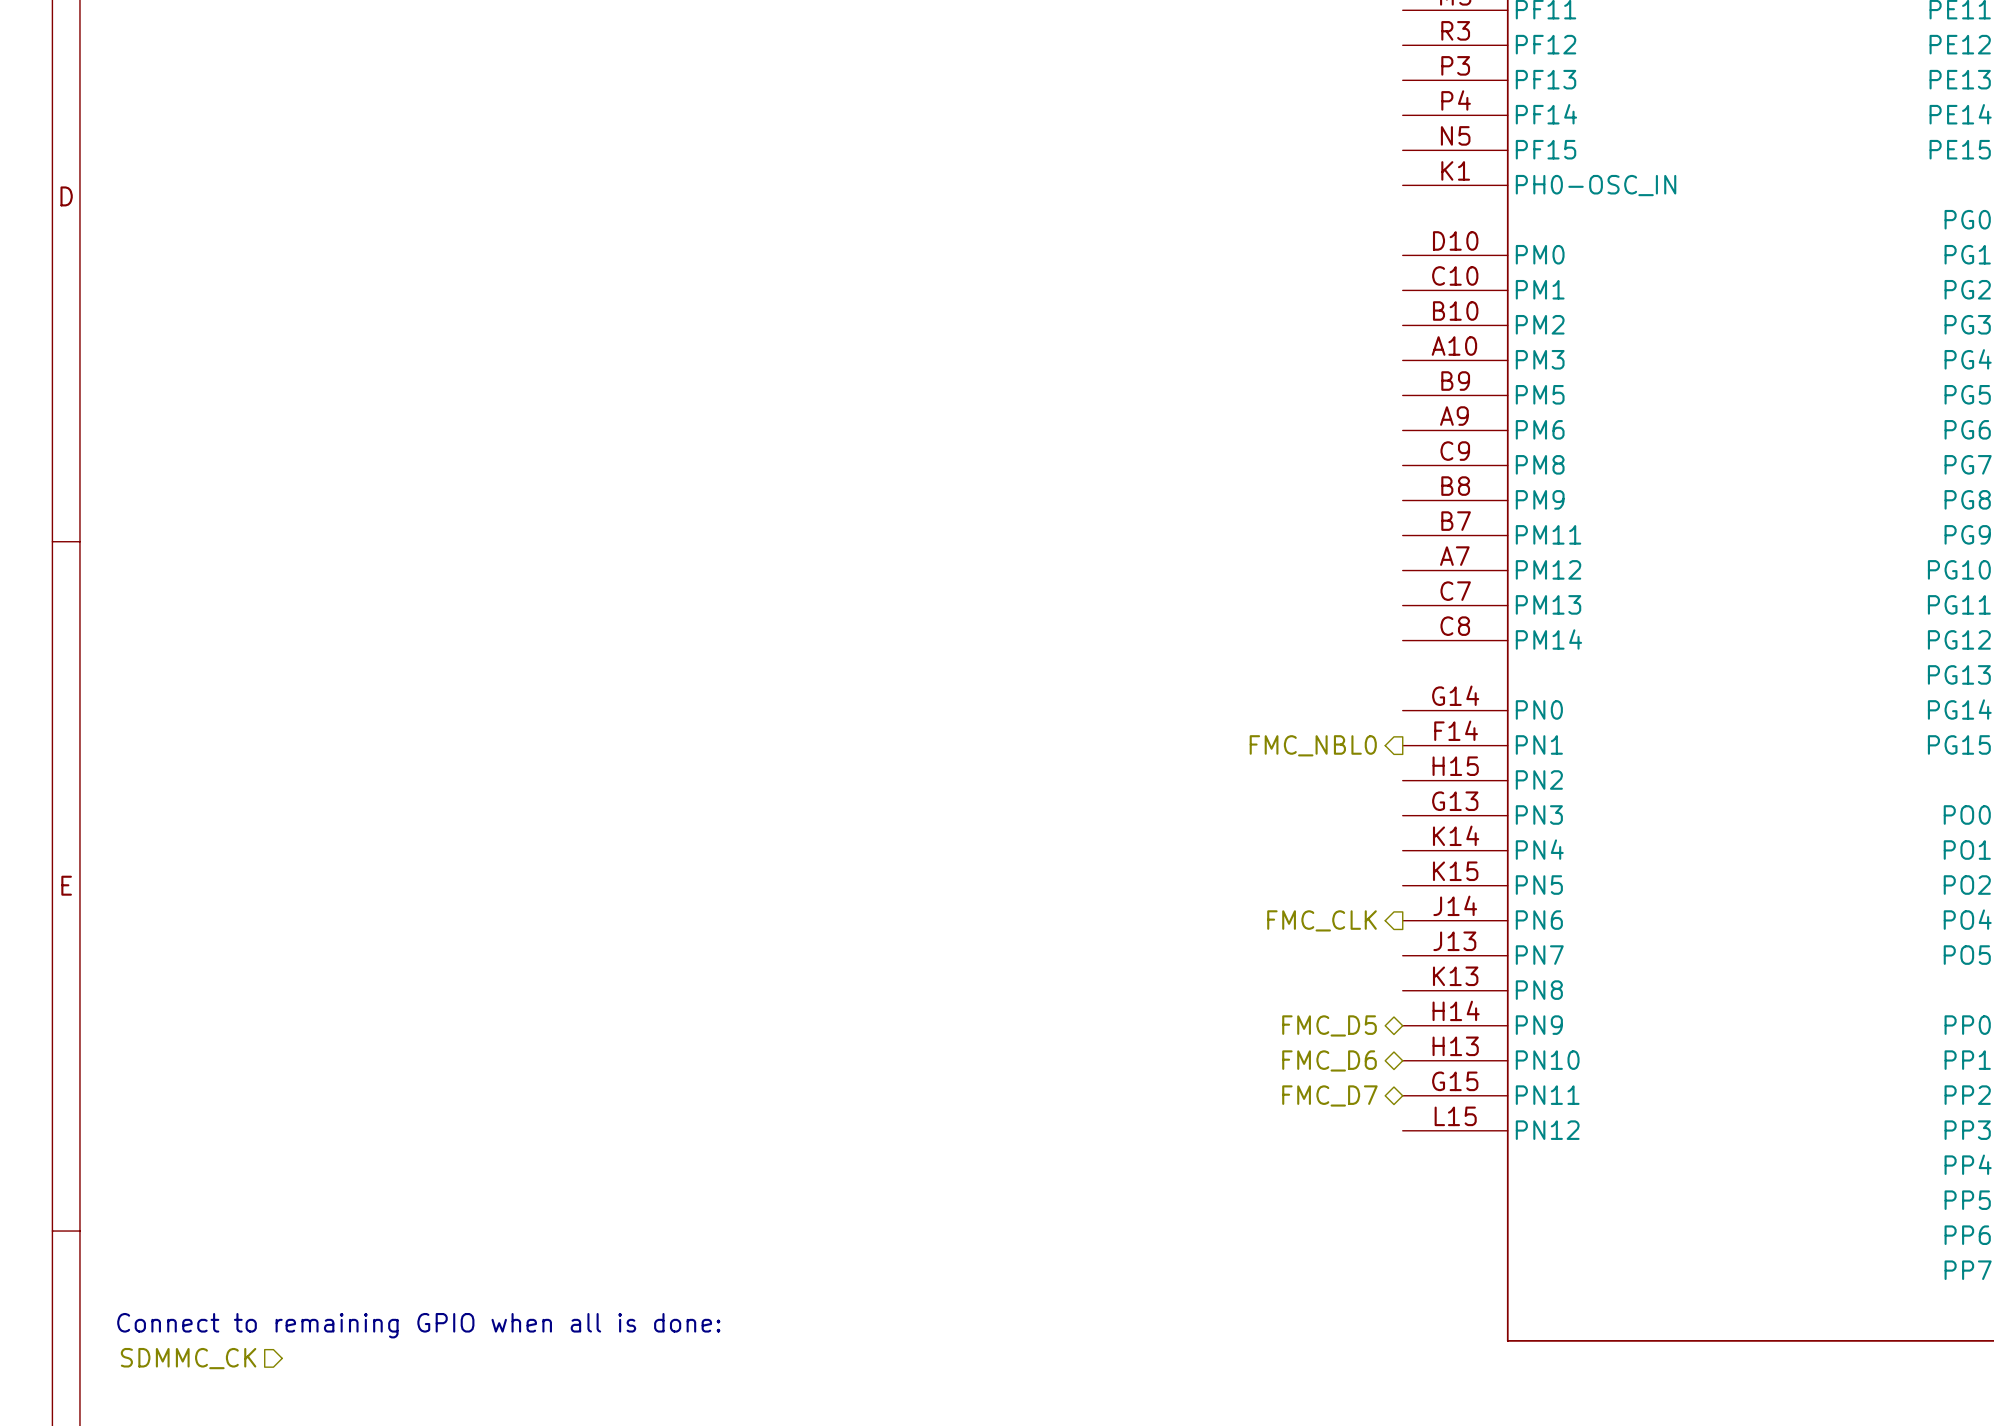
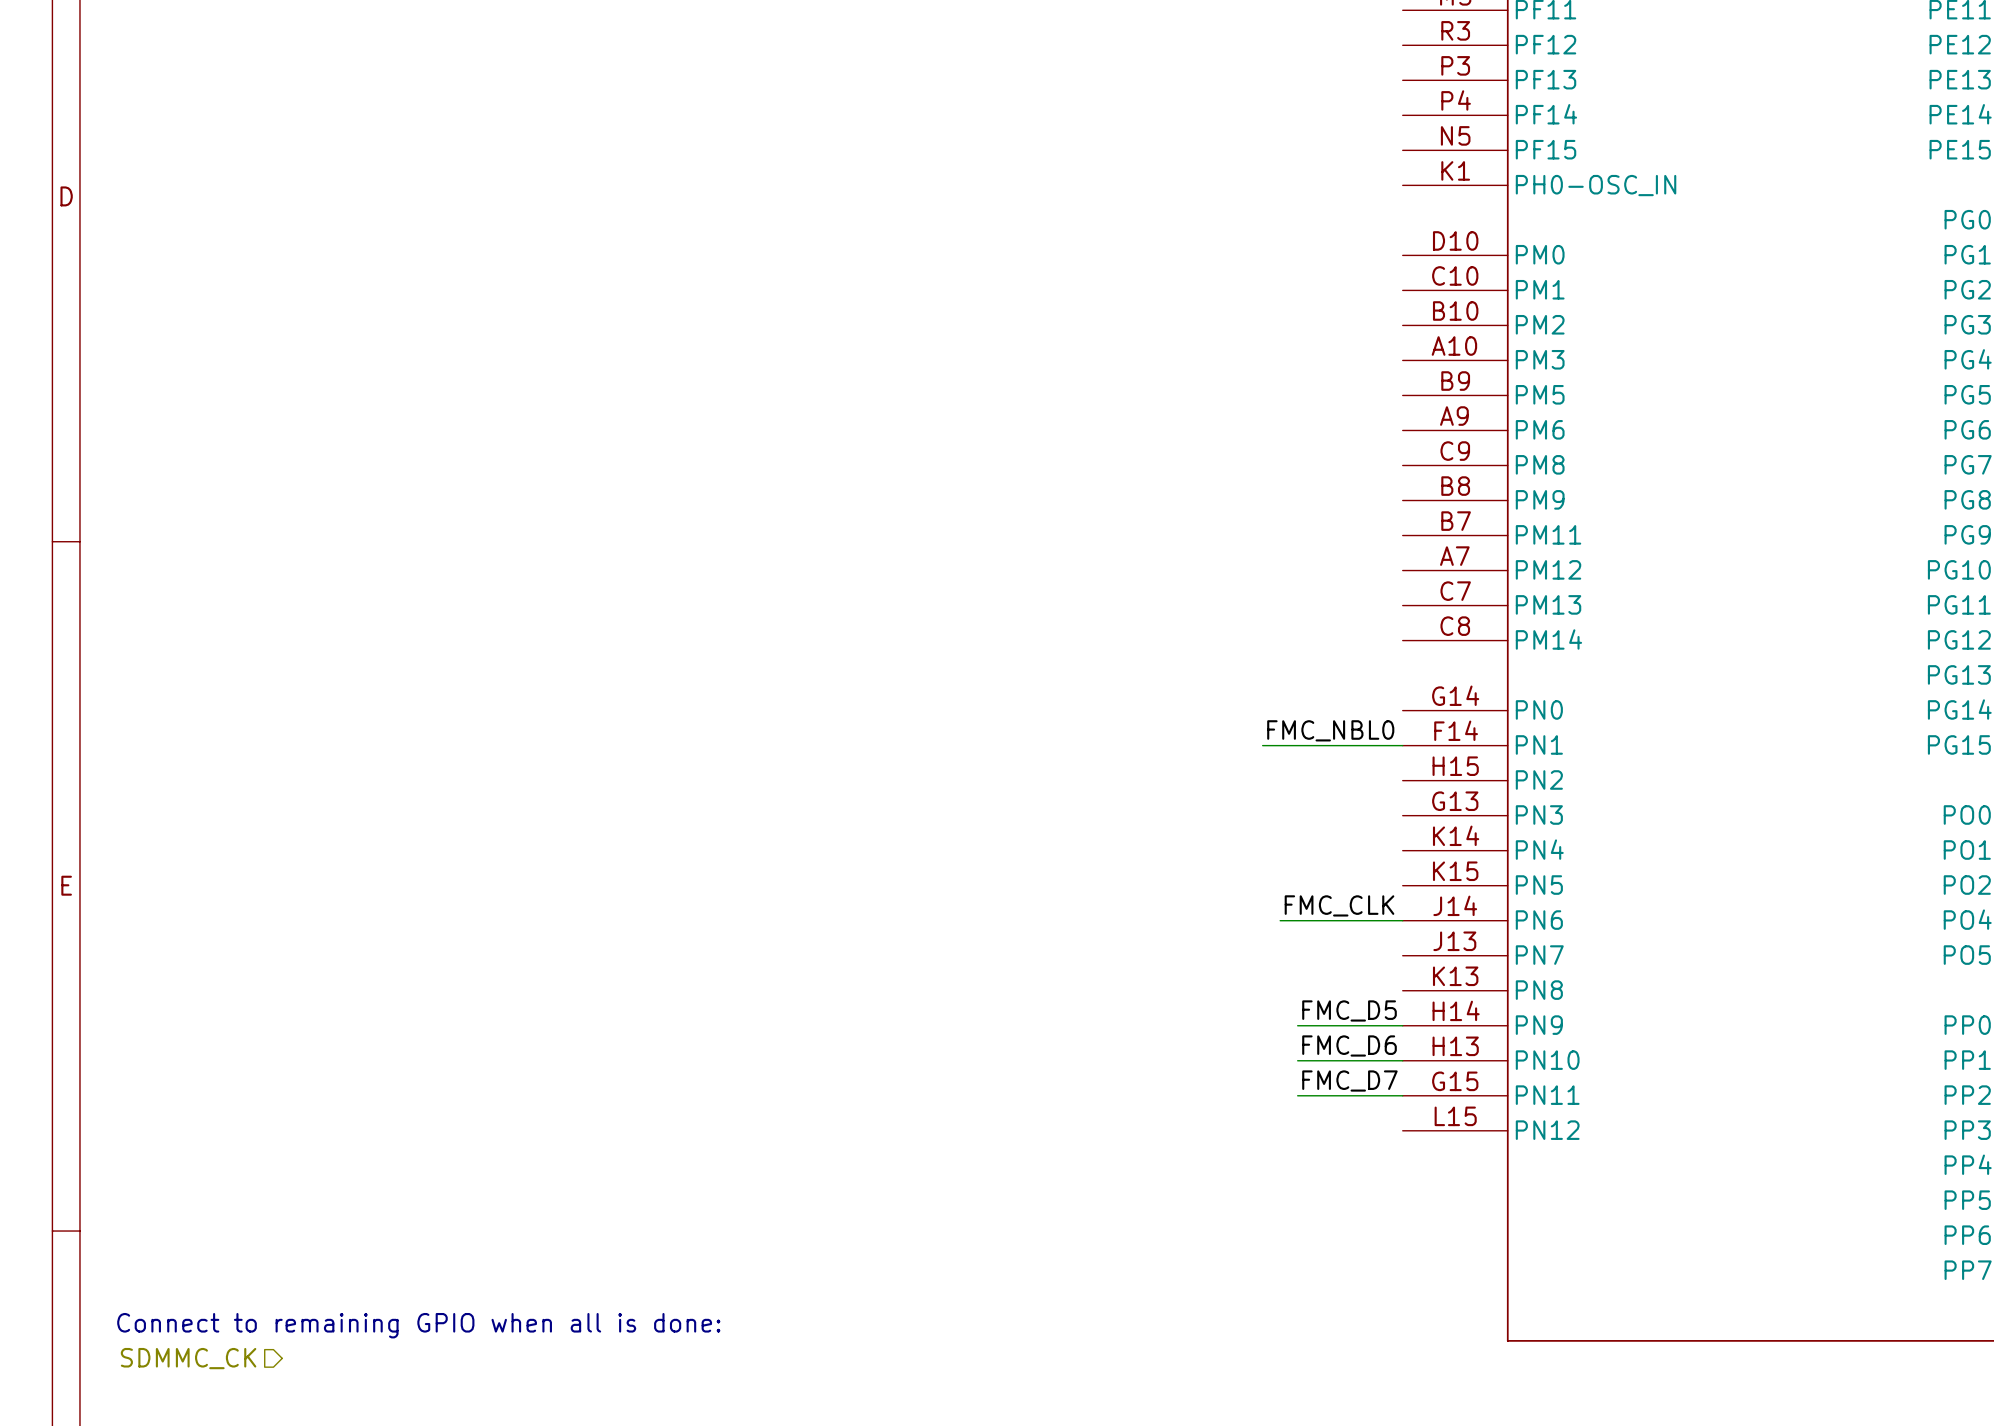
label: none -> FMC_NBL0 (1330, 730)
wire: none -> (1262, 745) (1402, 745)
hierarchical label: FMC_NBL0 (1313, 745) -> none
label: none -> FMC_CLK (1339, 905)
wire: none -> (1280, 920) (1402, 920)
hierarchical label: FMC_CLK (1322, 920) -> none
label: none -> FMC_D5 (1349, 1010)
wire: none -> (1297, 1025) (1402, 1025)
hierarchical label: FMC_D5 (1329, 1025) -> none
label: none -> FMC_D6 (1349, 1045)
wire: none -> (1297, 1060) (1402, 1060)
hierarchical label: FMC_D6 (1329, 1060) -> none
label: none -> FMC_D7 (1349, 1080)
wire: none -> (1297, 1095) (1402, 1095)
hierarchical label: FMC_D7 (1329, 1095) -> none

